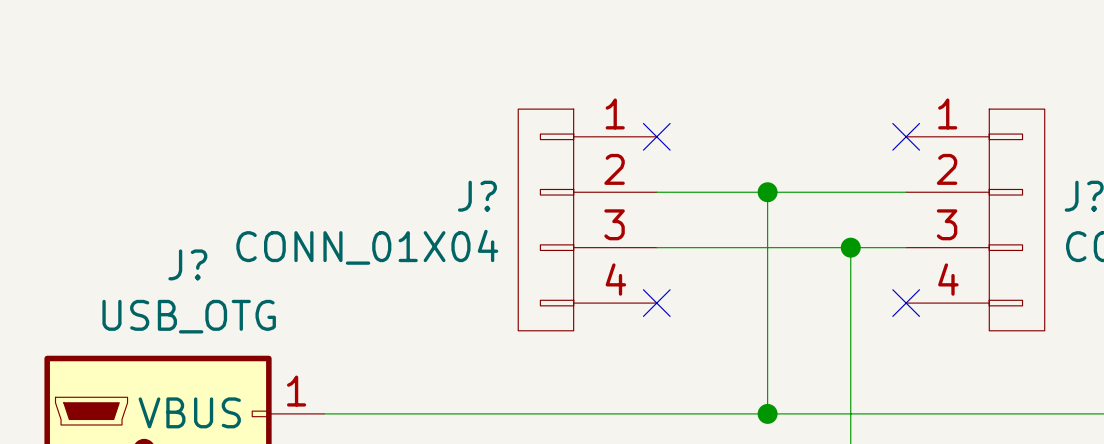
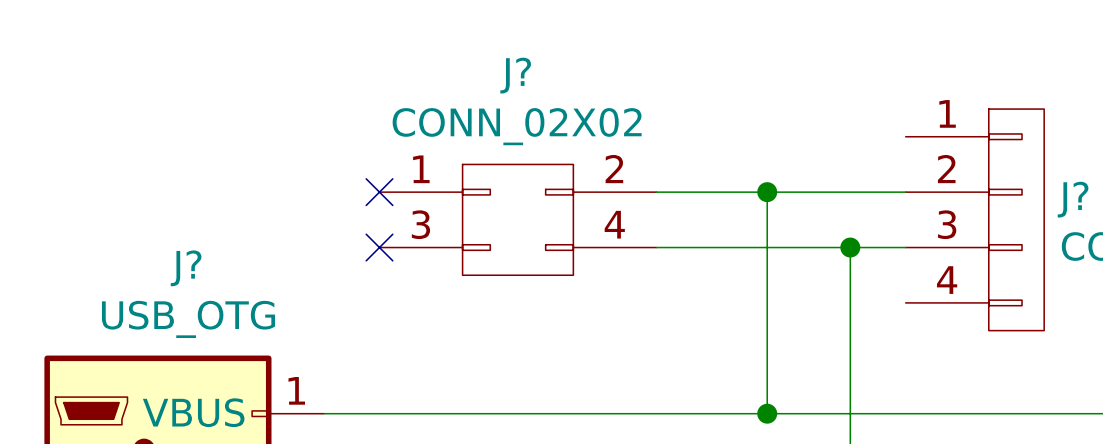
no-connect mark: (656, 136) -> none
no-connect mark: (906, 136) -> none
no-connect mark: none -> (379, 192)
J?: none -> CONN_02X02 (517, 219)
J?: CONN_01X04 (587, 219) -> none
no-connect mark: none -> (379, 247)
no-connect mark: (656, 303) -> none
no-connect mark: (906, 303) -> none

